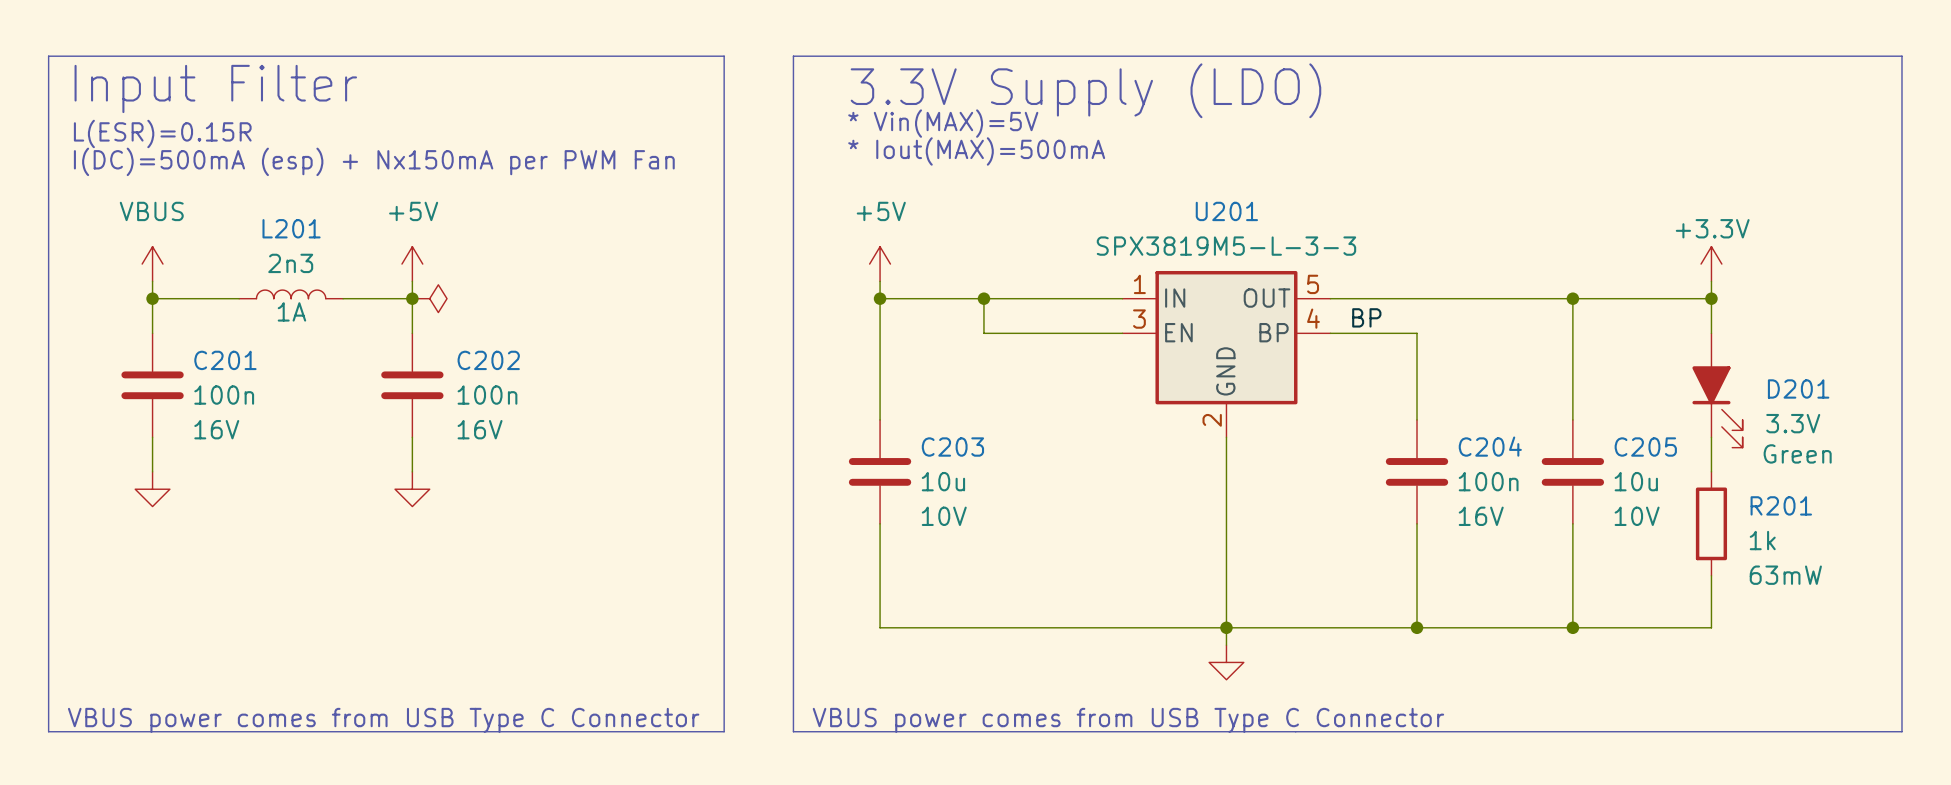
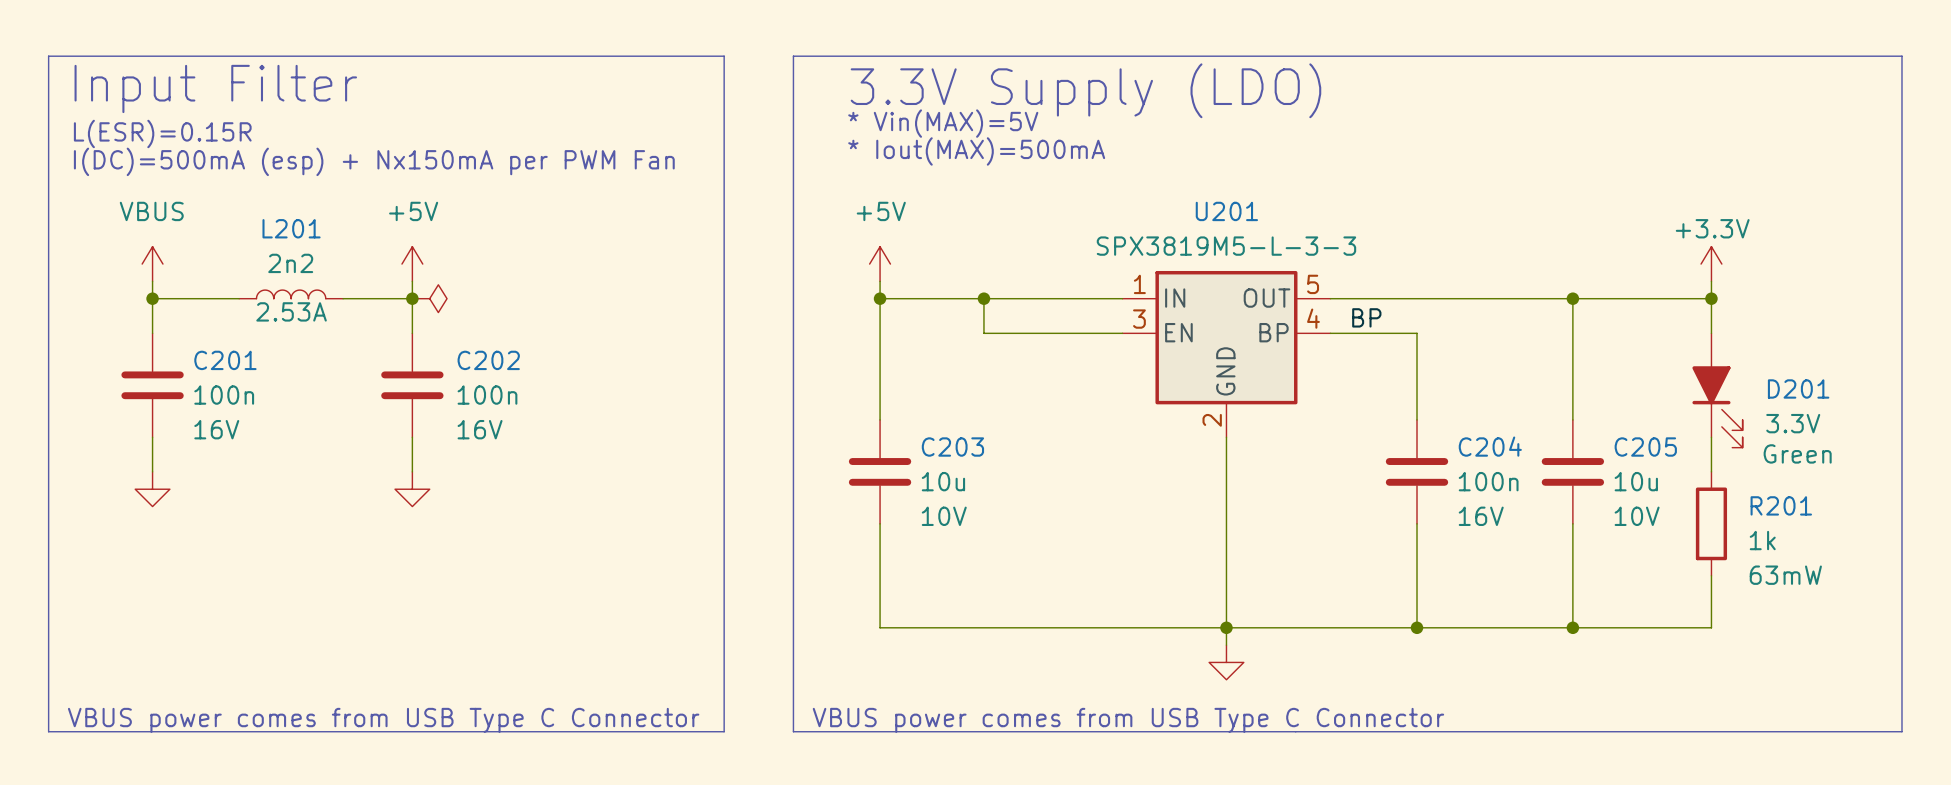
L201 value: 2n3 (290, 263) -> 2n2 (290, 263)
L201 text: 1A (291, 311) -> 2.53A (291, 311)

